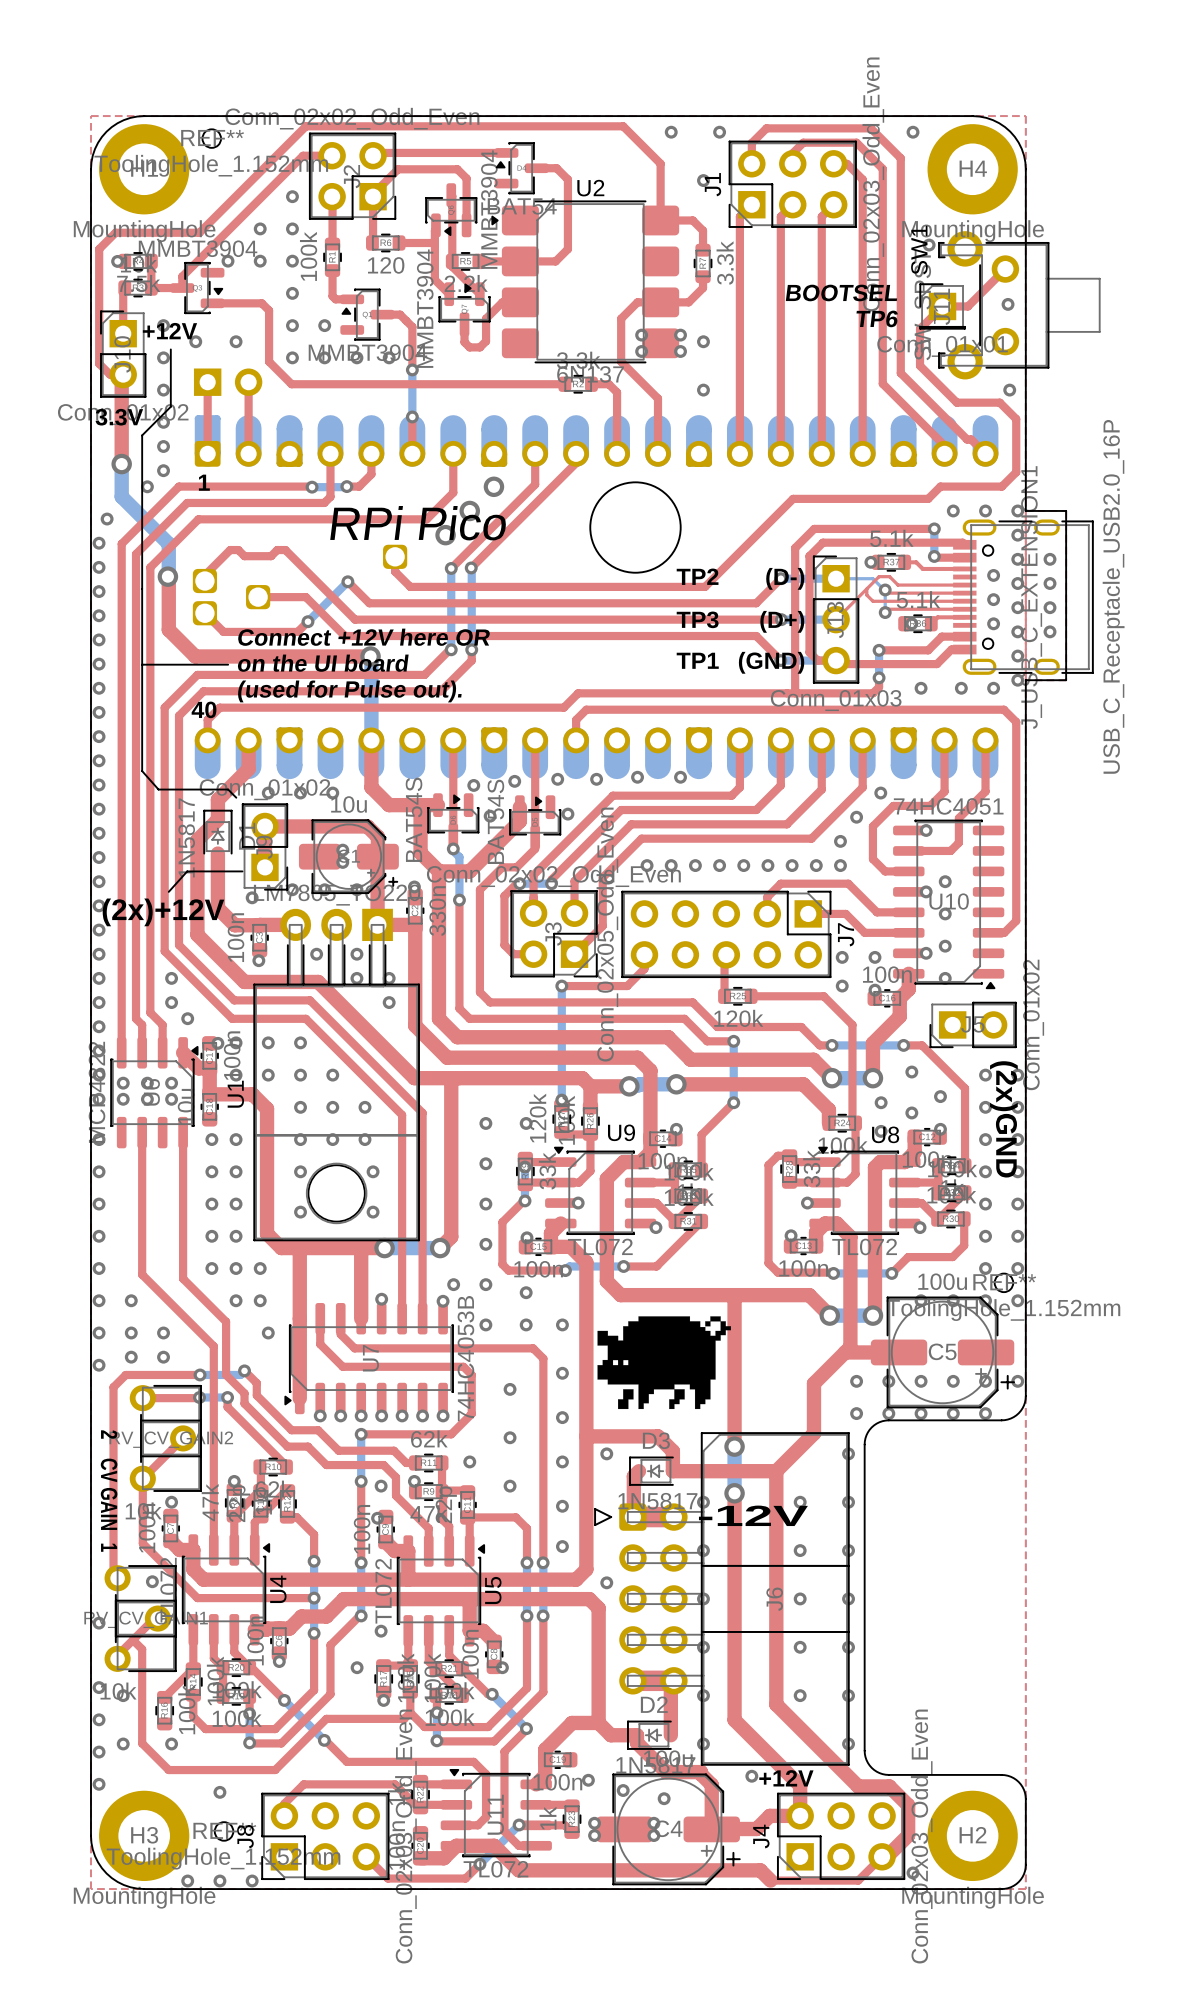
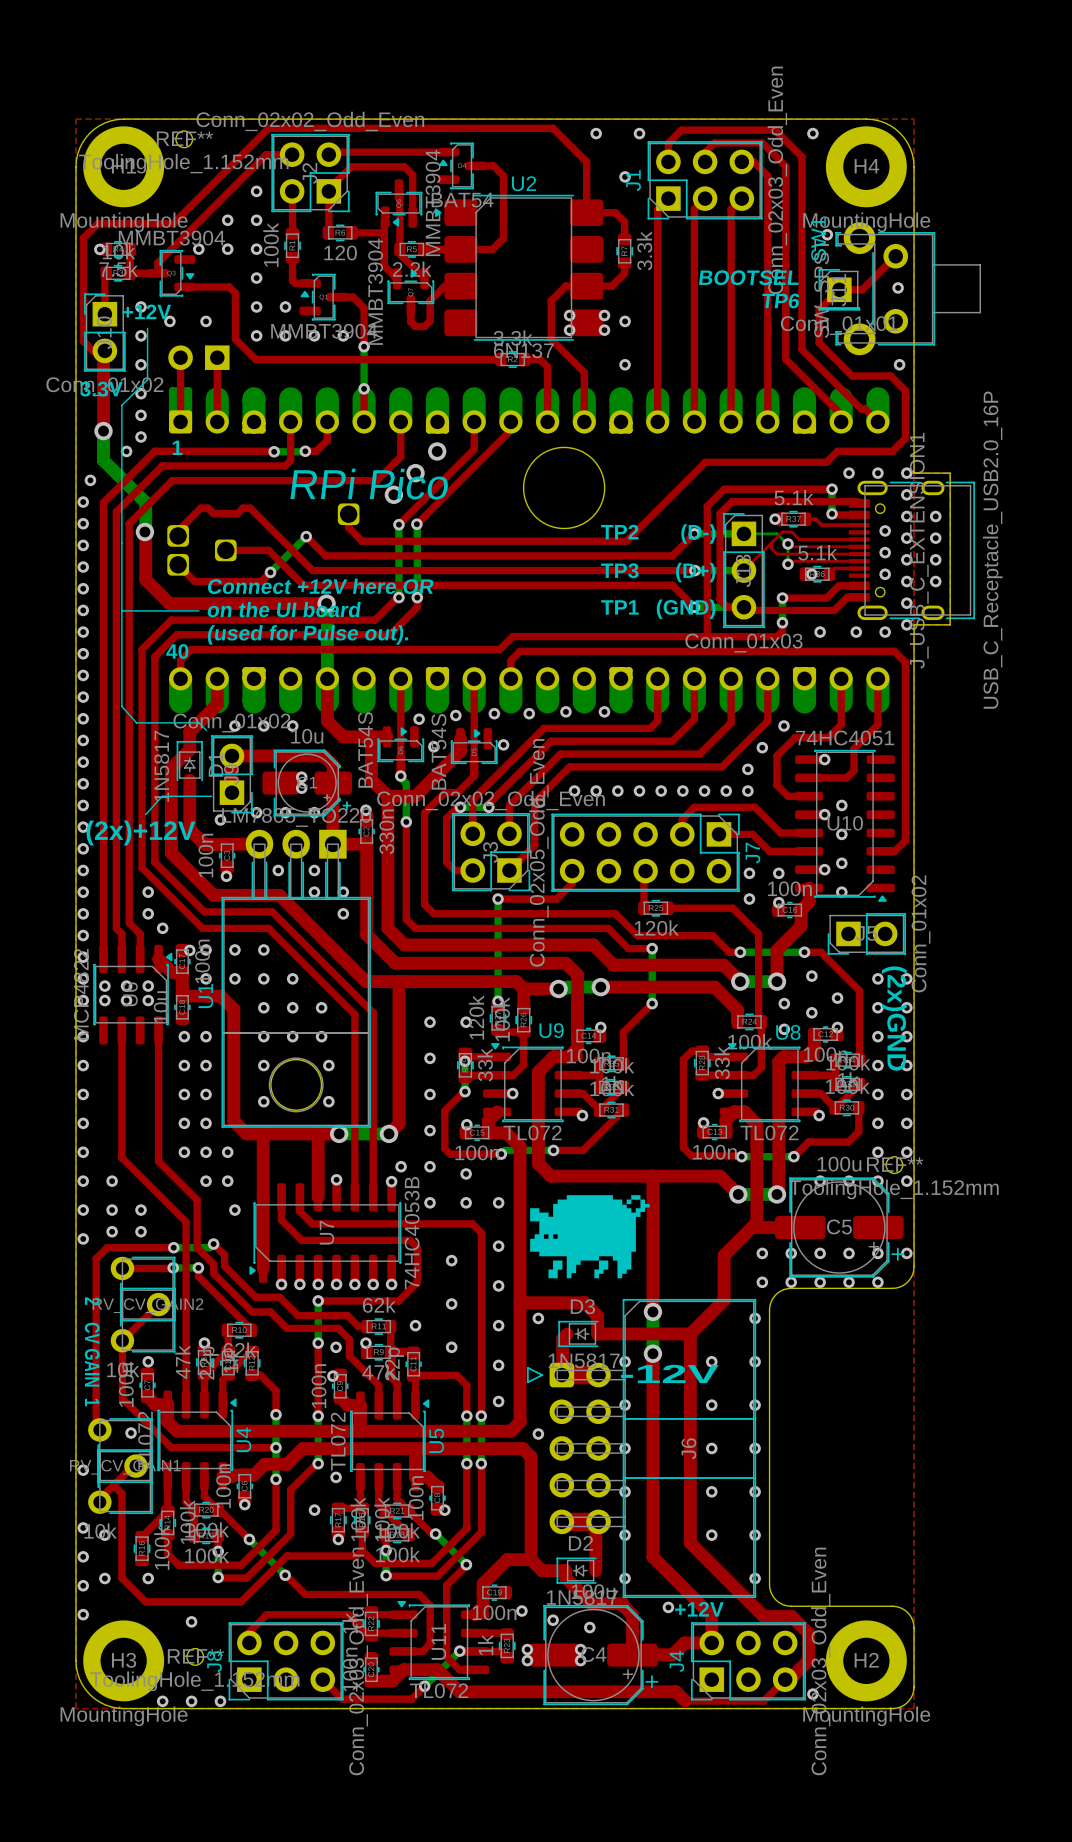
part rotation: 0° (228, 382) -> 180° (198, 357)

